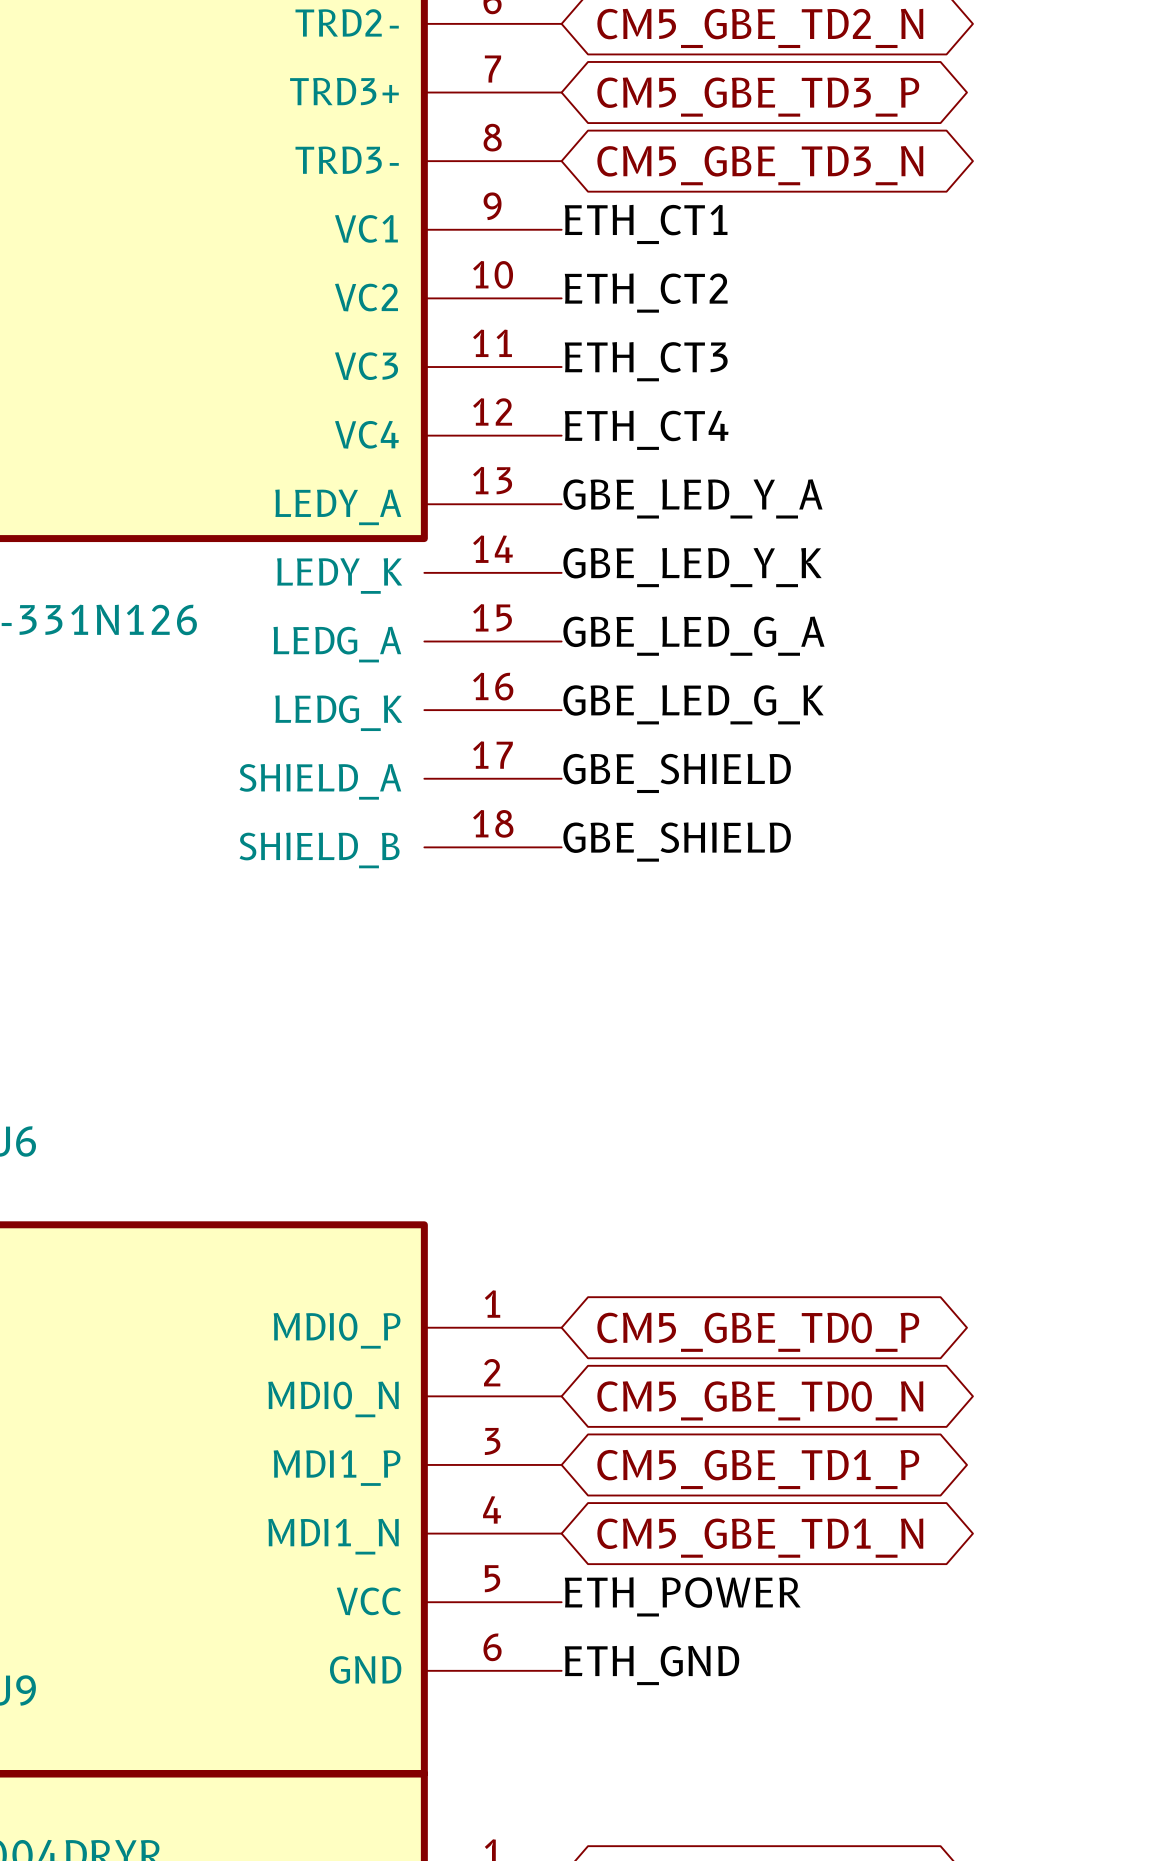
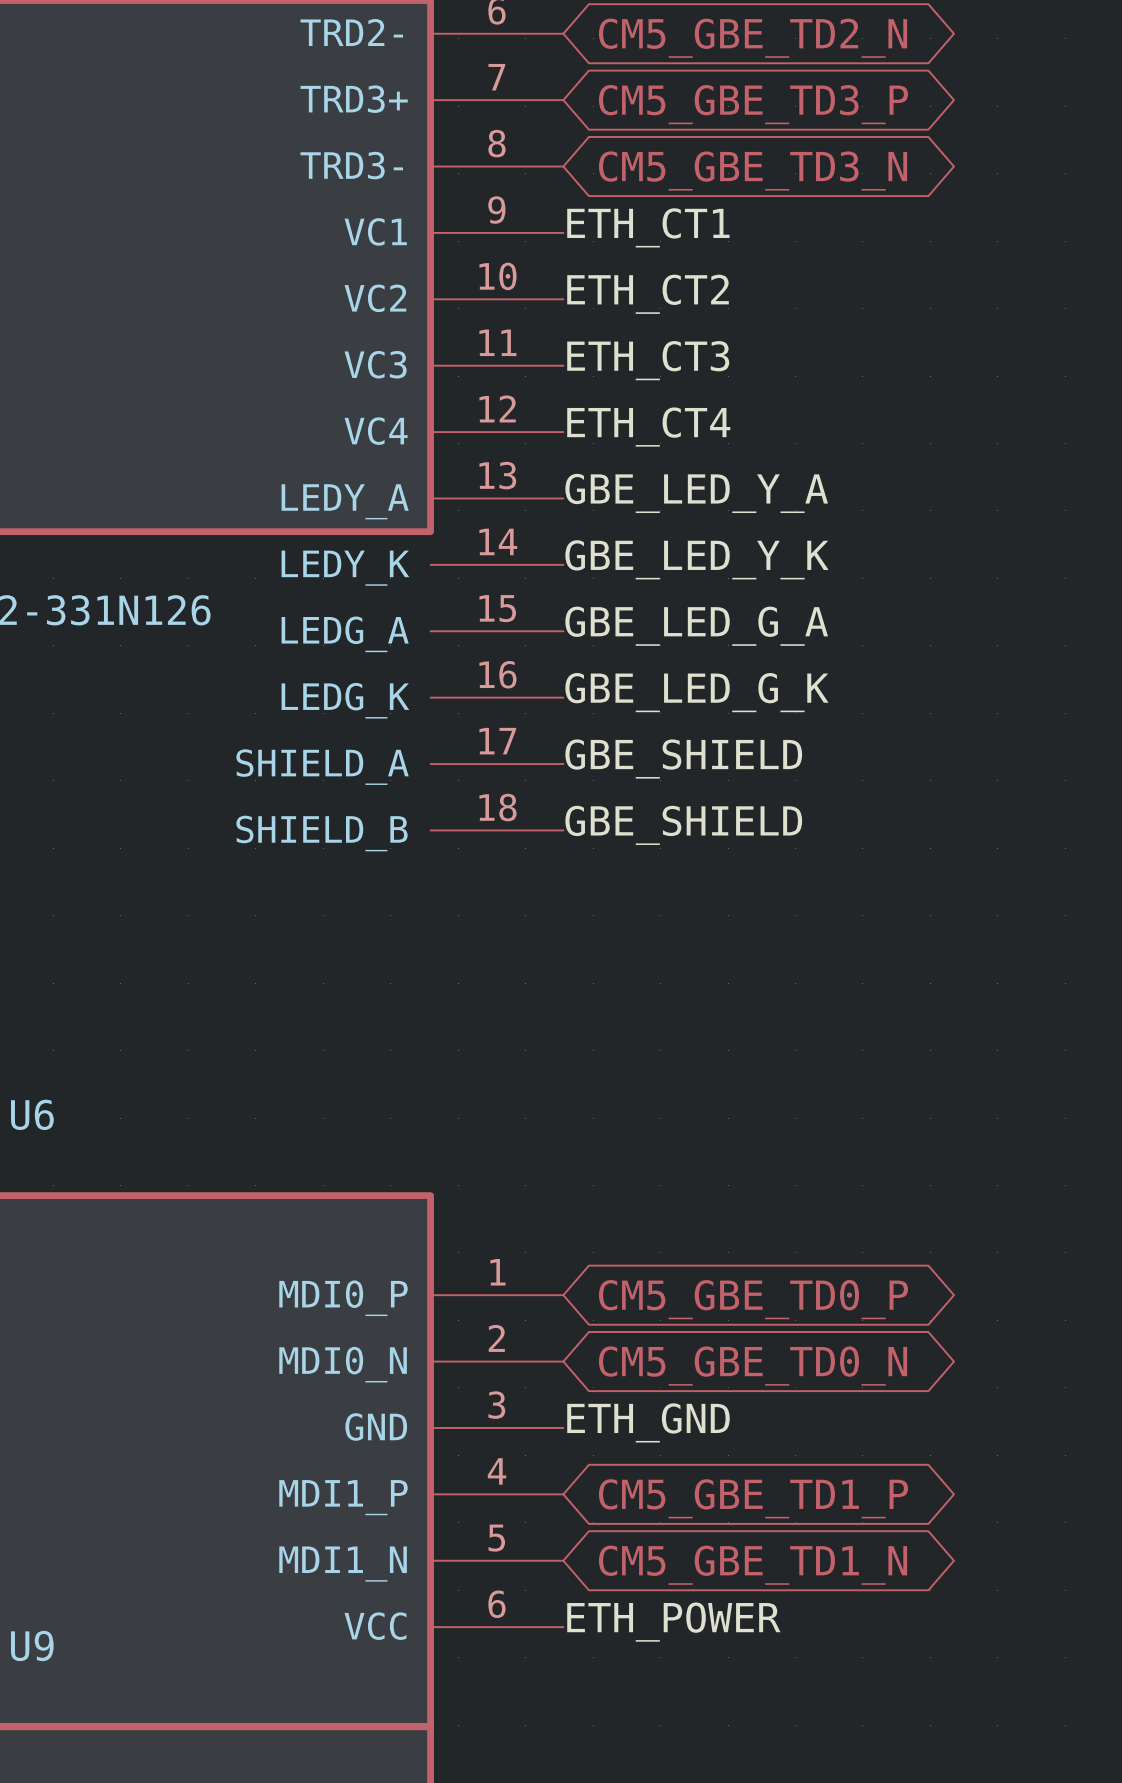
label: none -> ETH_GND (648, 1422)
U6 pin name: MDI1_P (337, 1468) -> GND (376, 1426)
global label: CM5_GBE_TD1_P (758, 1469) -> none
U6 pin name: MDI1_N (333, 1536) -> MDI1_P (343, 1497)
global label: CM5_GBE_TD1_N (760, 1538) -> CM5_GBE_TD1_P (753, 1498)
label: ETH_POWER (682, 1596) -> none
U6 pin name: VCC (368, 1601) -> MDI1_N (343, 1564)
global label: none -> CM5_GBE_TD1_N (753, 1565)
label: ETH_GND (651, 1665) -> ETH_POWER (673, 1622)
U6 pin name: GND (365, 1669) -> VCC (375, 1626)

